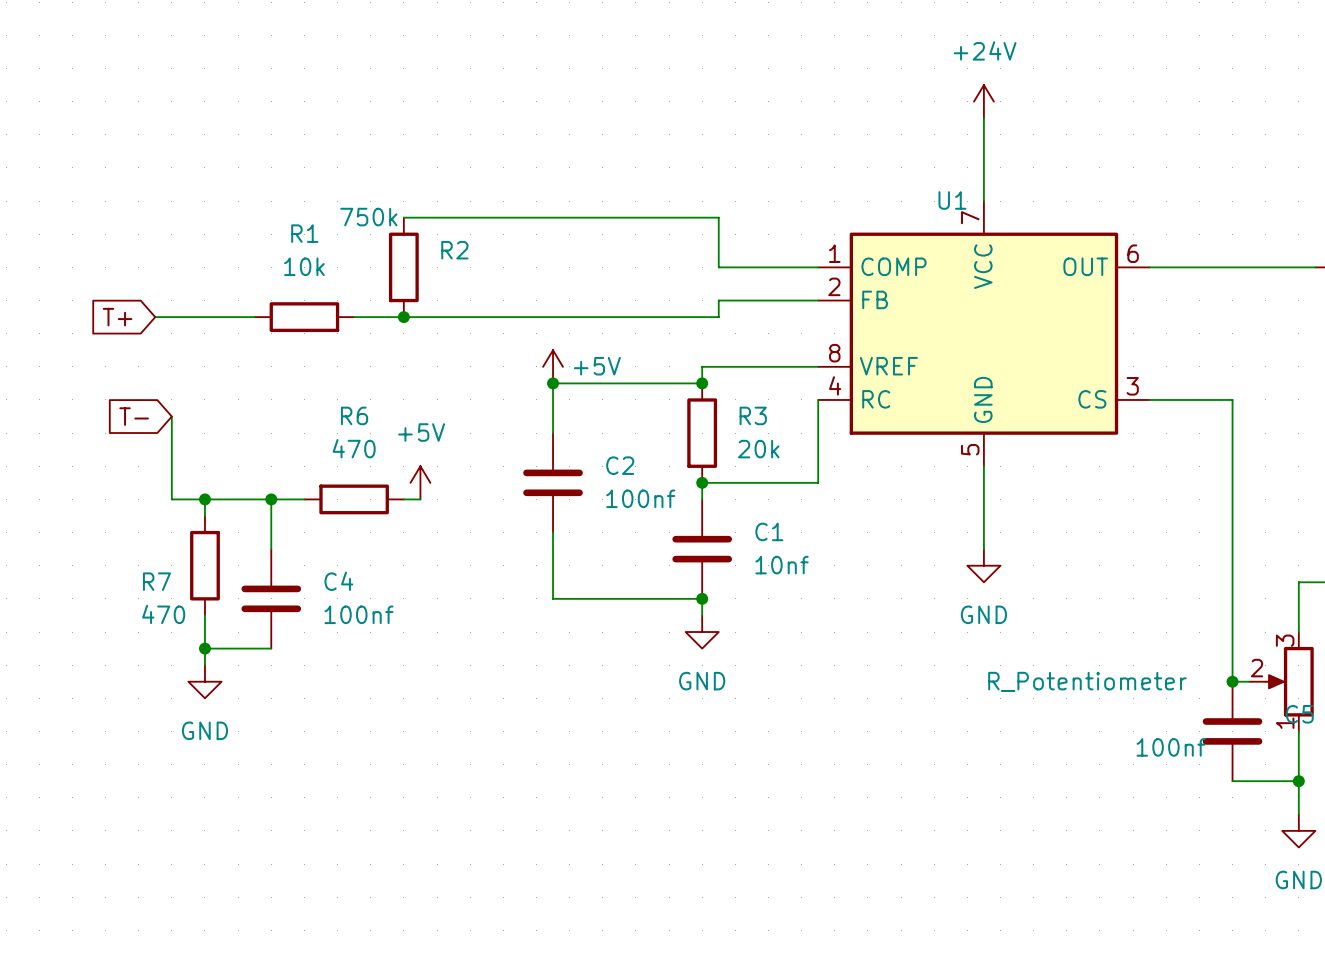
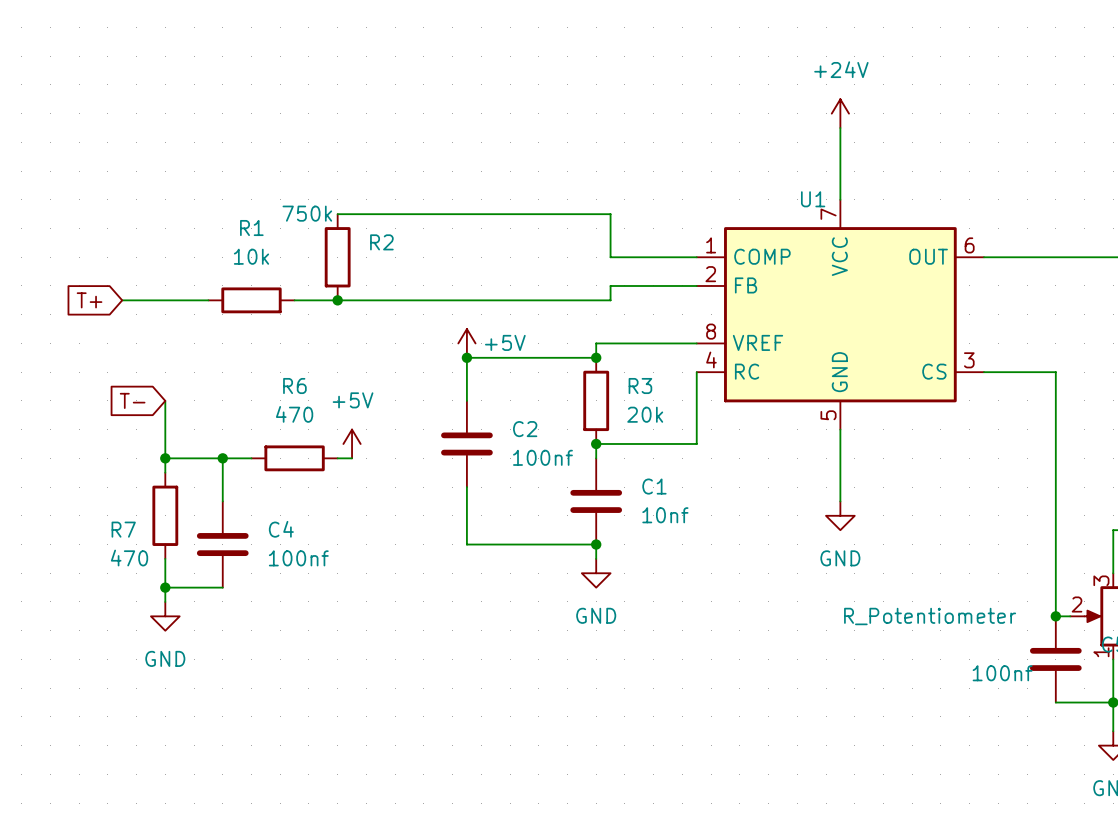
global label position: T- (134, 416) -> T- (132, 400)
wire: (171, 416) (171, 499) (204, 499) -> (165, 400) (165, 458)

